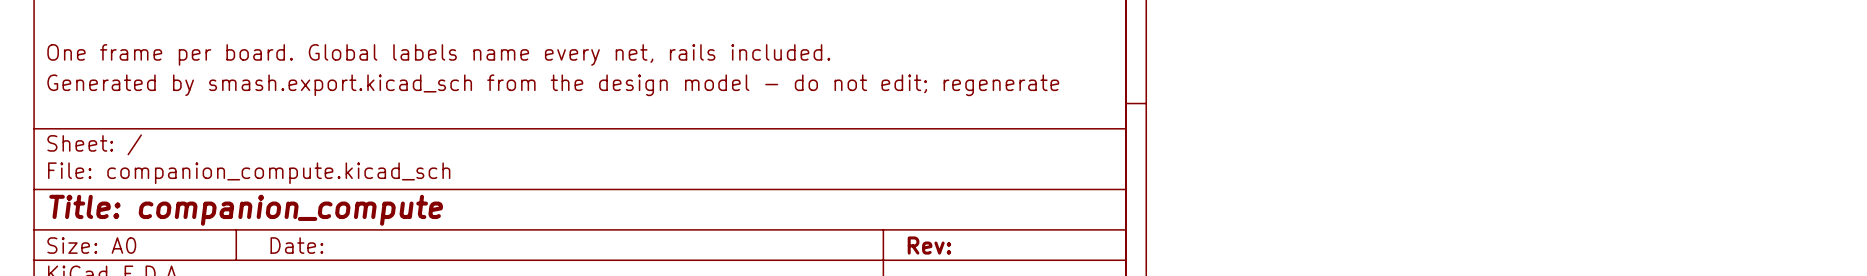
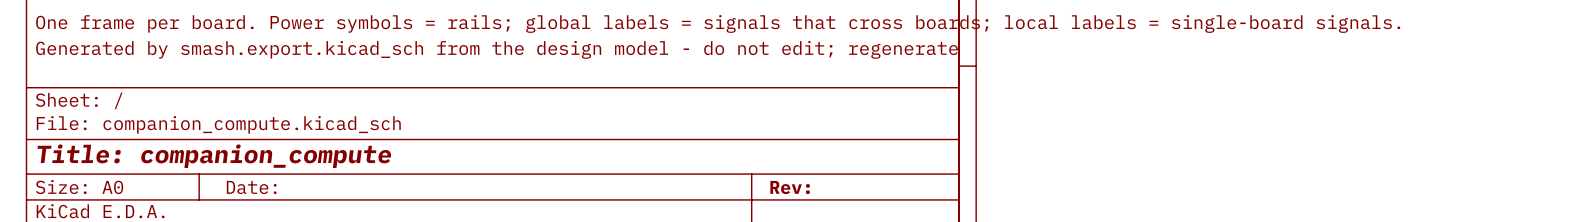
title block: One frame per board. Global labels name every net, rails included. (438, 54) -> One frame per board. Power symbols = rails; global labels = signals that cross boards; local labels = single-board signals. (718, 23)

